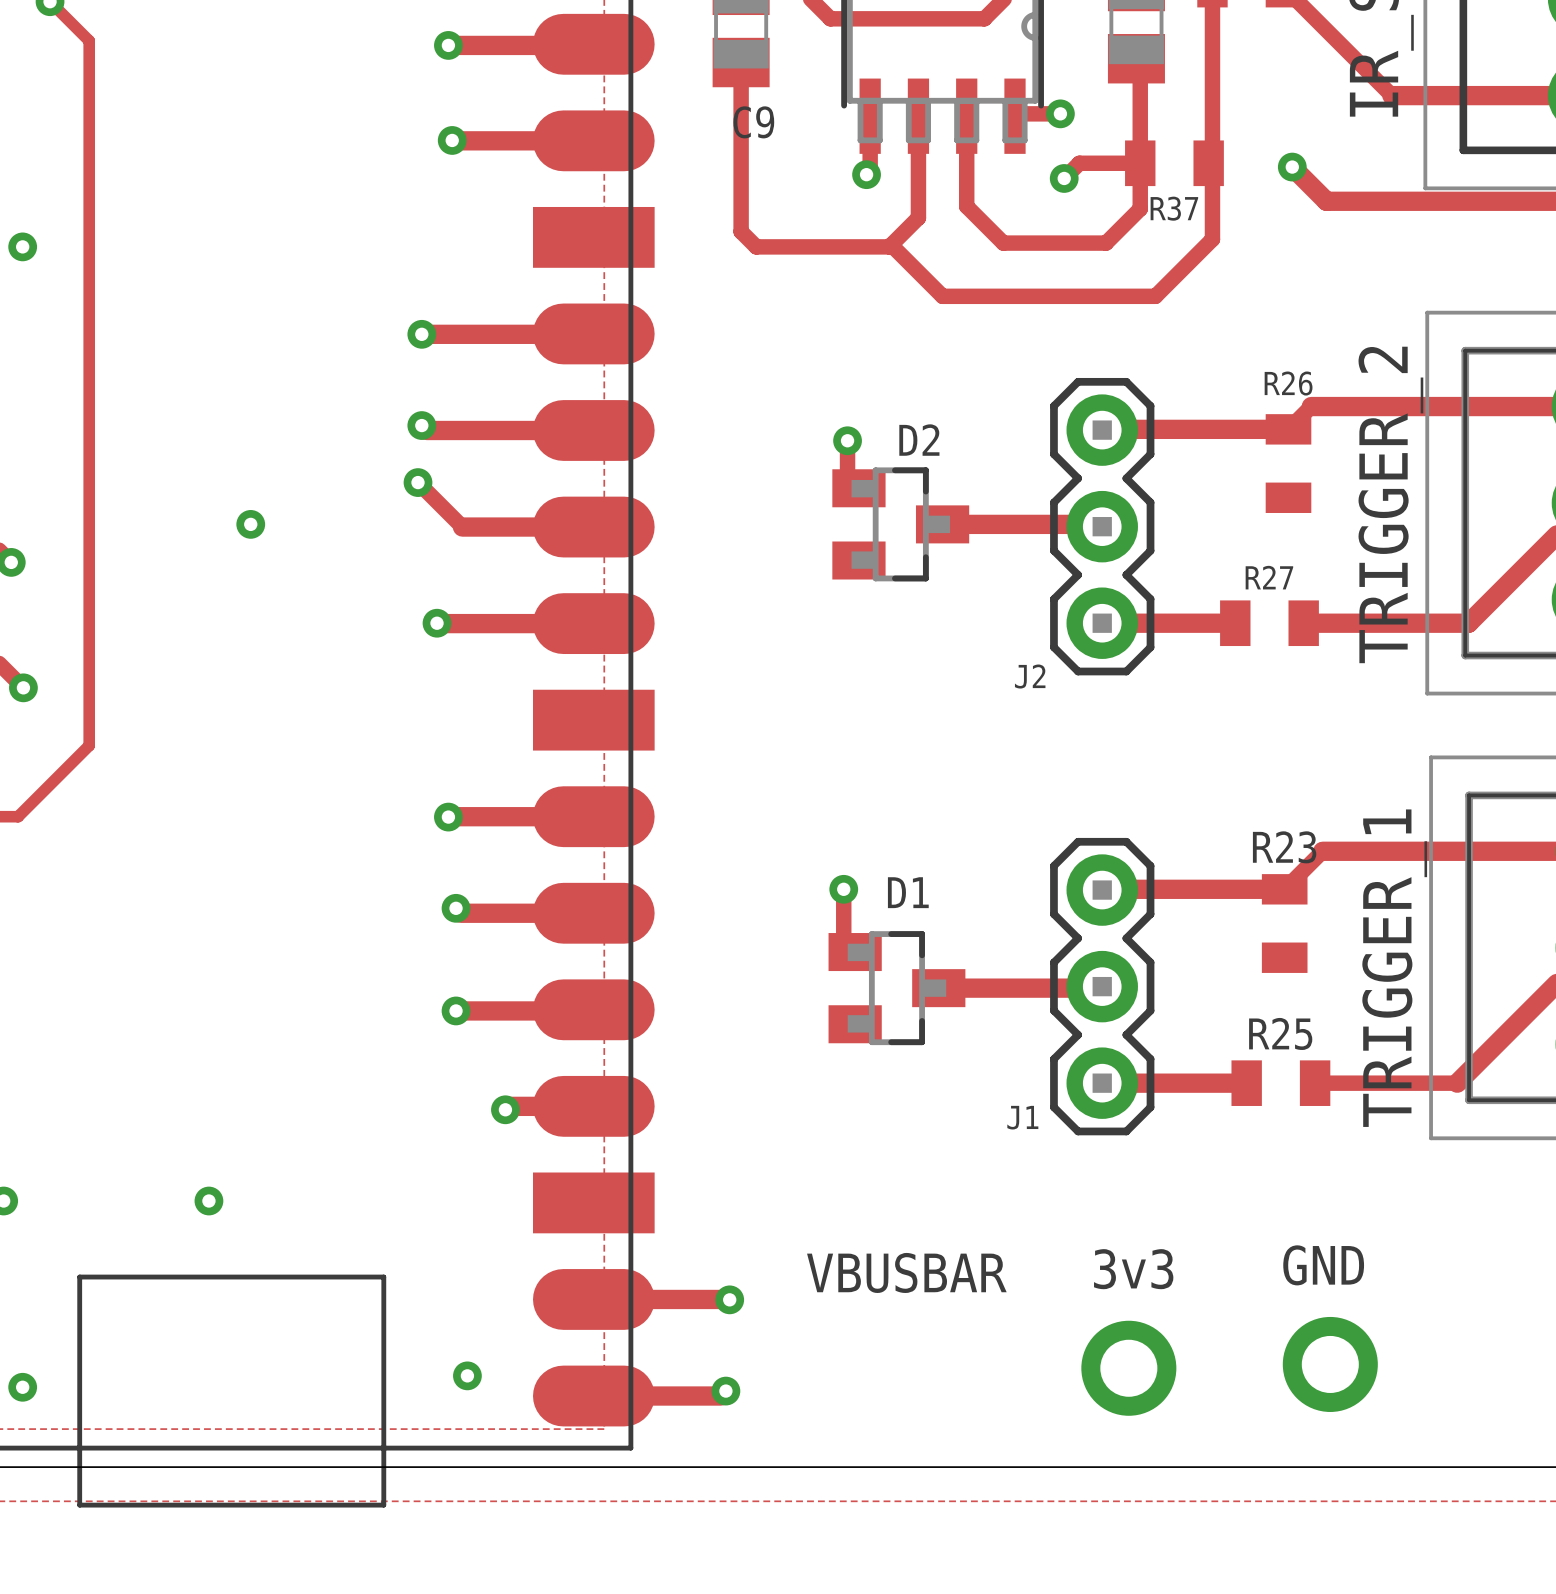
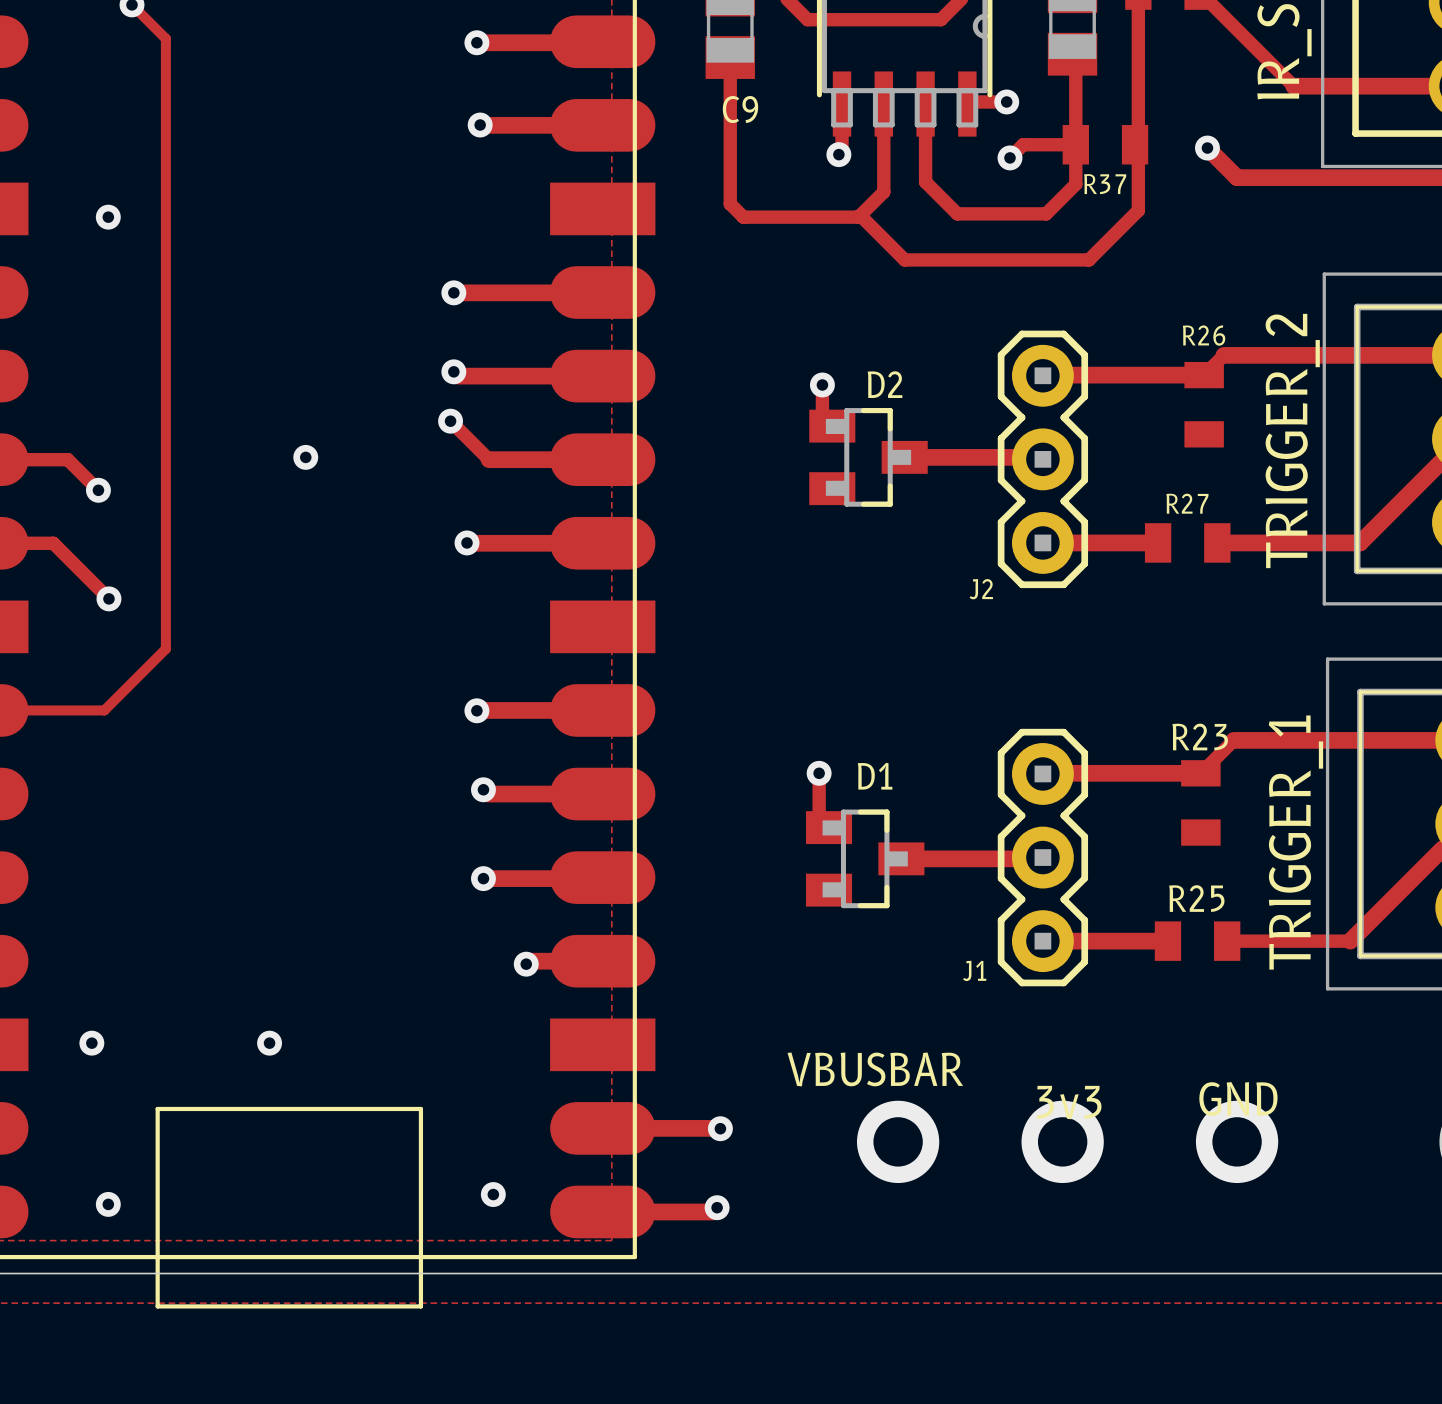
text position: VBUSBAR (906, 1272) -> VBUSBAR (875, 1069)
via: none -> (898, 1141)
via position: (1330, 1364) -> (1237, 1141)
via position: (1128, 1368) -> (1062, 1141)

